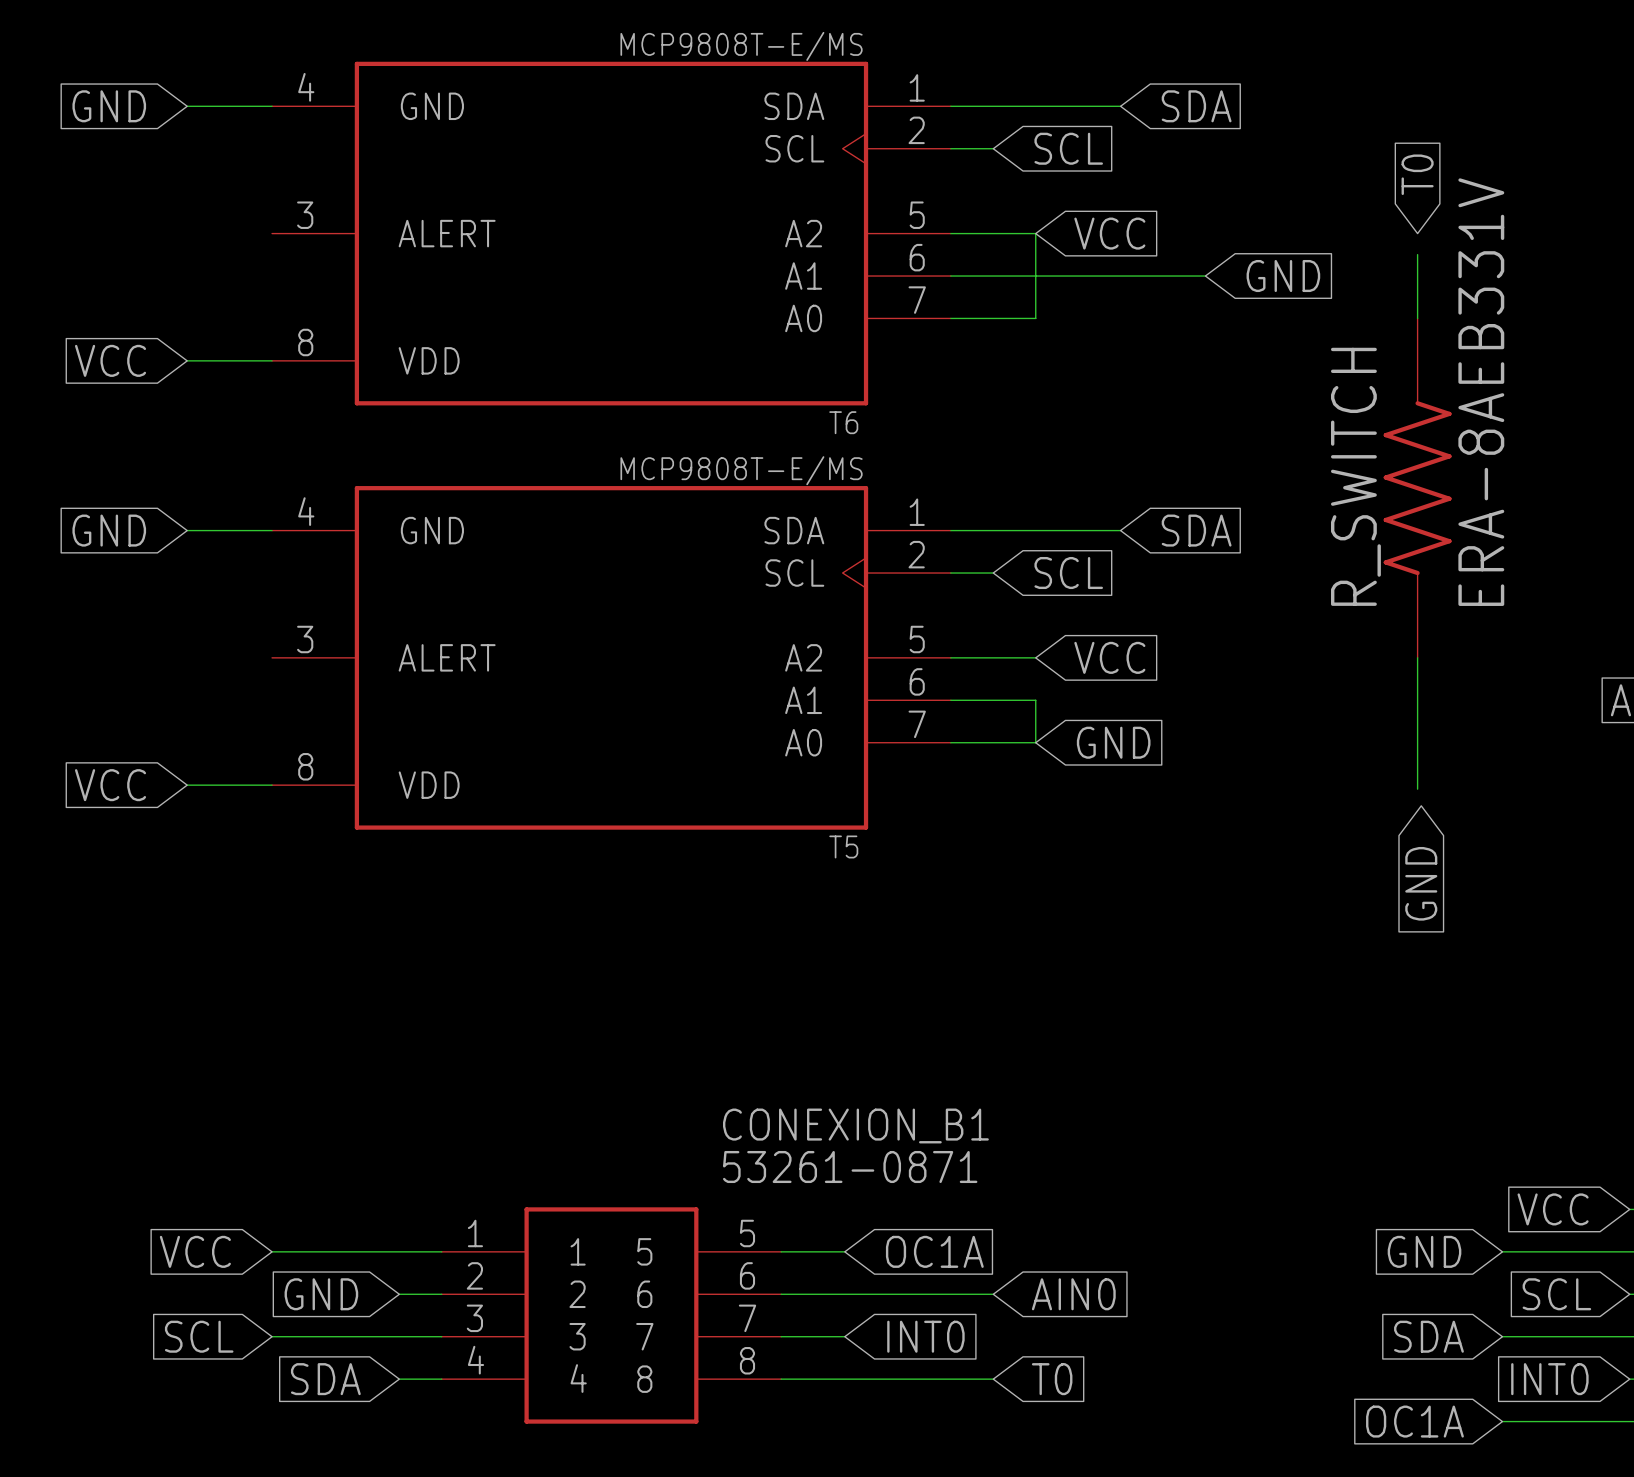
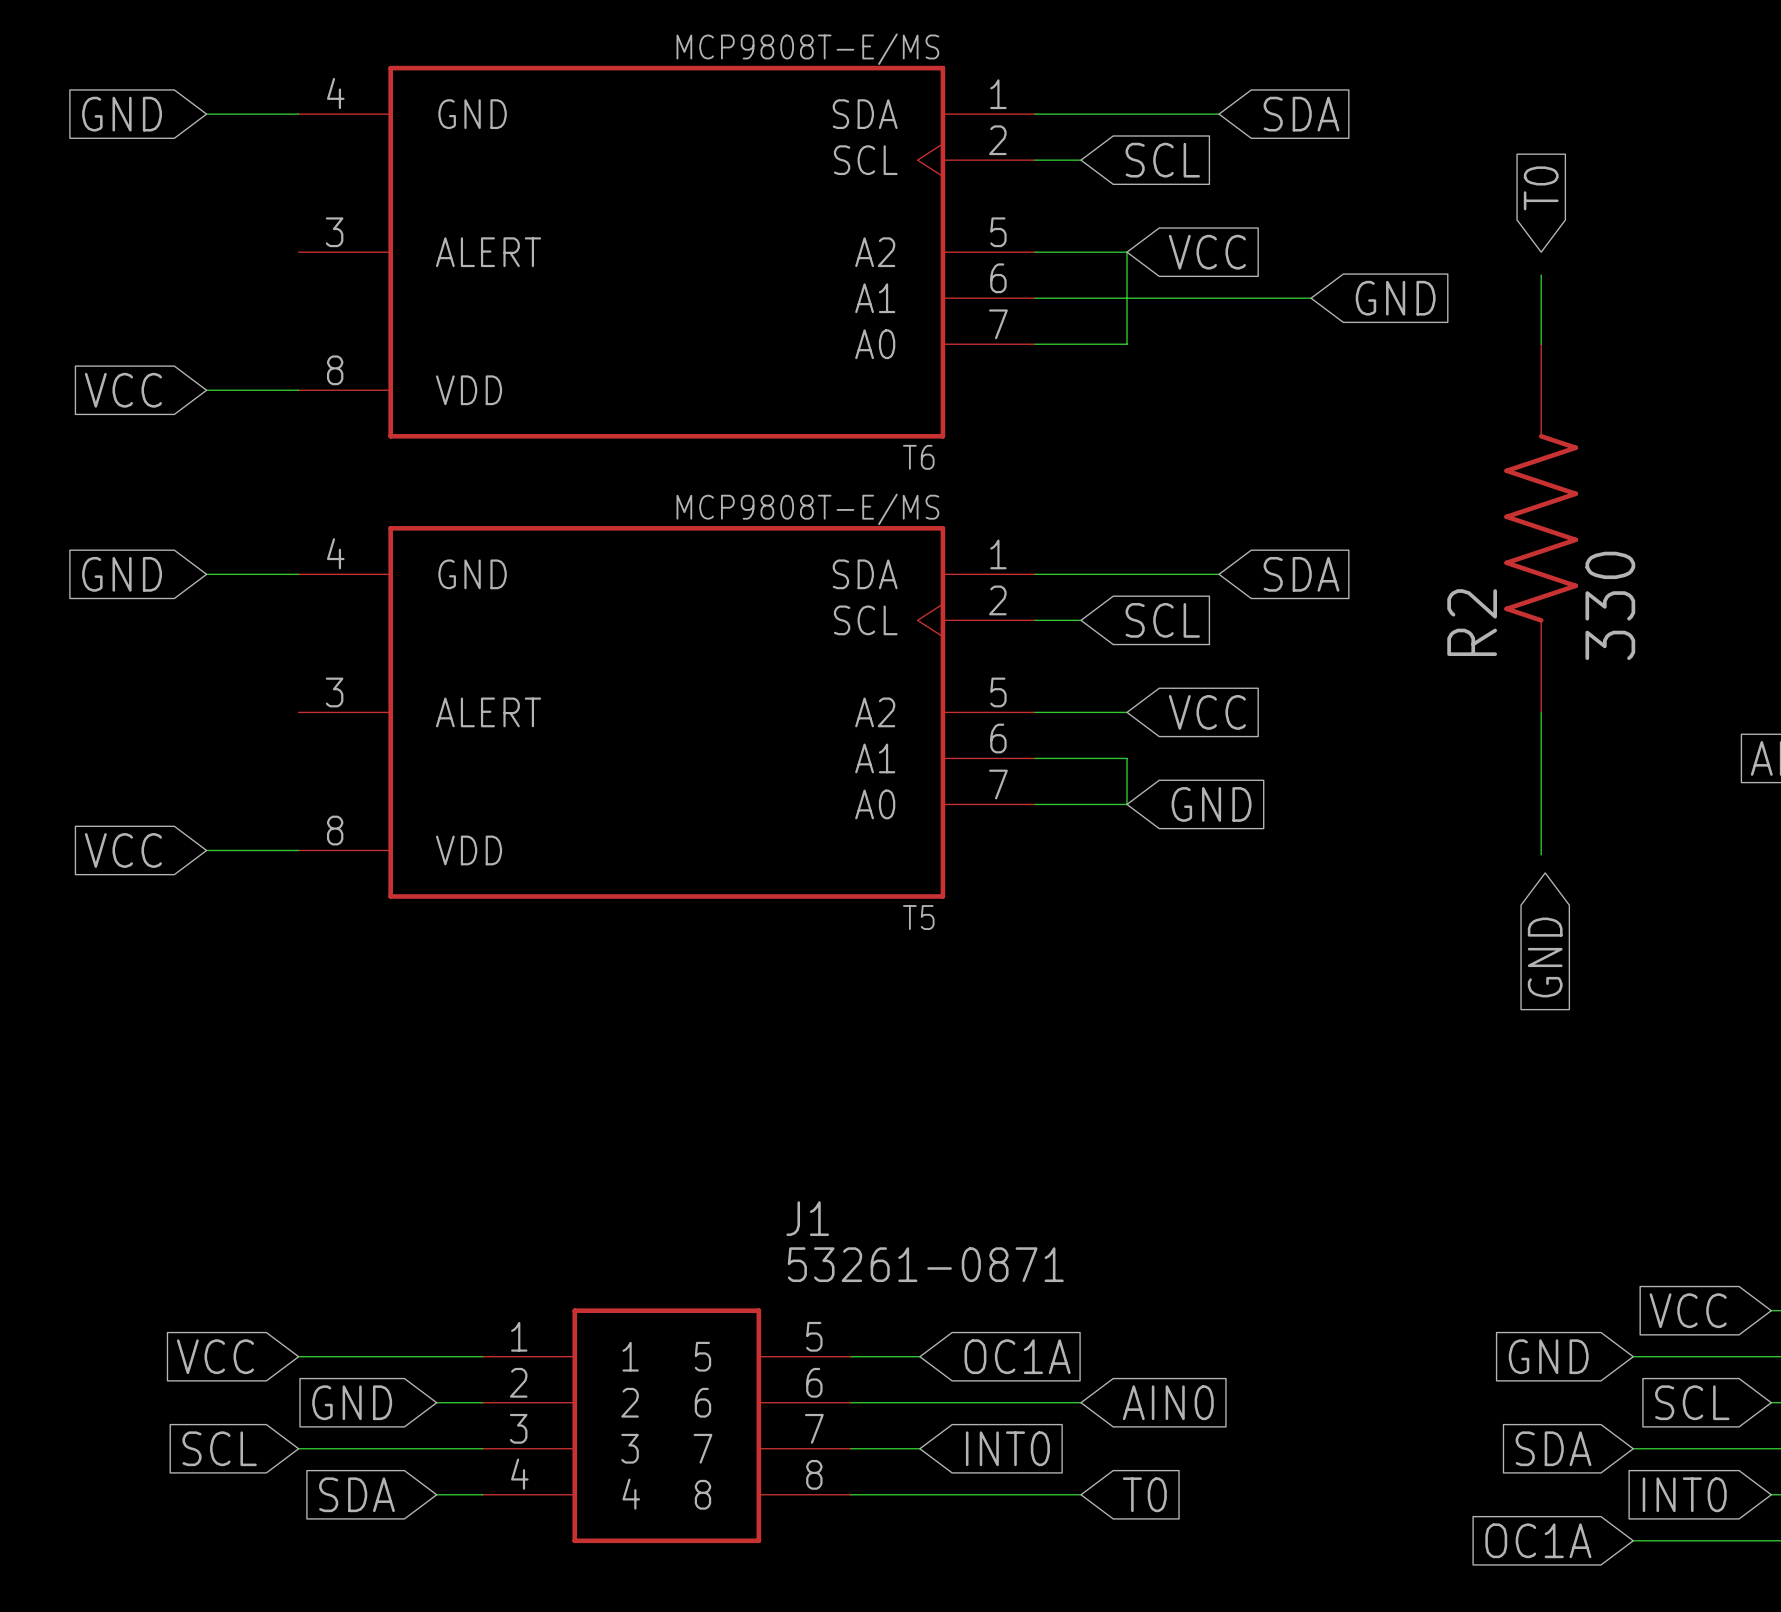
R_SWITCH value: ERA-8AEB331V (1481, 392) -> 330 (1610, 605)
R_SWITCH name: R_SWITCH (1355, 476) -> R2 (1472, 622)
CONEXION_B1 name: CONEXION_B1 (855, 1125) -> J1 (807, 1218)

